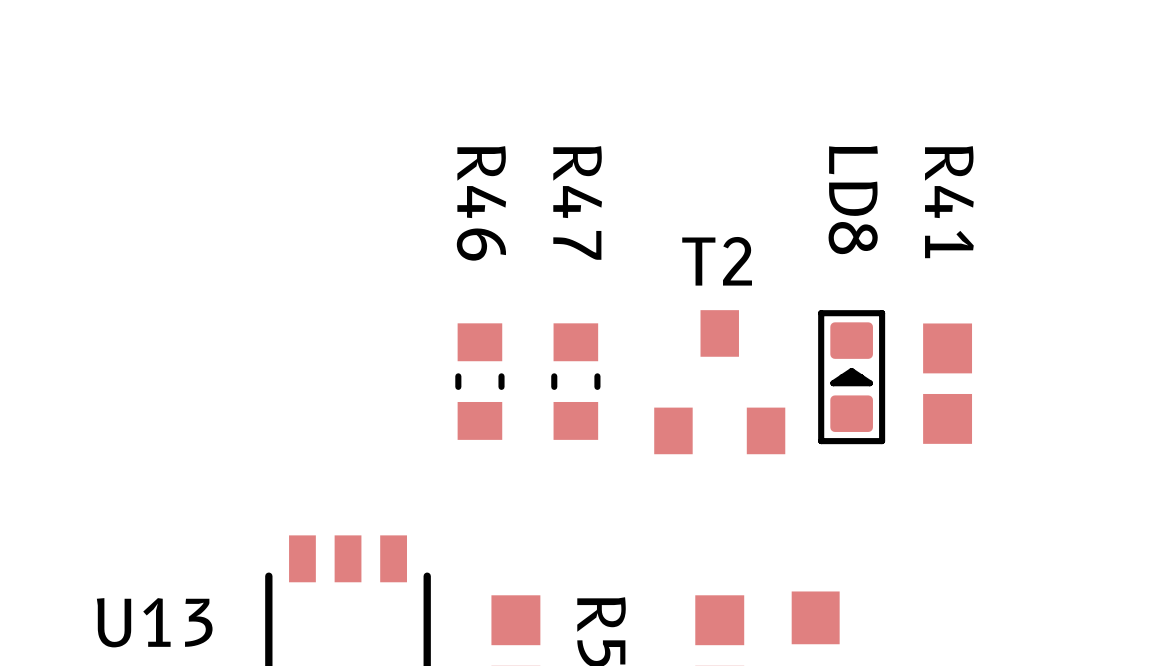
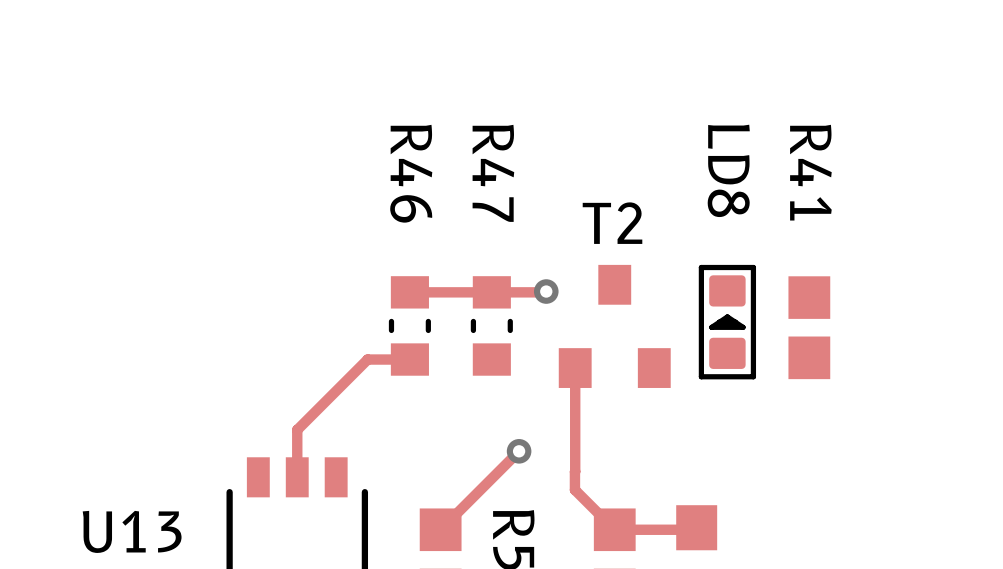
track: none -> (546, 291) (409, 292)
via: none -> (546, 291)
track: none -> (409, 359) (367, 359) (297, 429) (297, 477)
track: none -> (575, 368) (575, 471)
track: none -> (519, 451) (440, 529)
via: none -> (519, 451)
track: none -> (574, 471) (574, 489) (614, 529) (694, 529) (696, 527)

